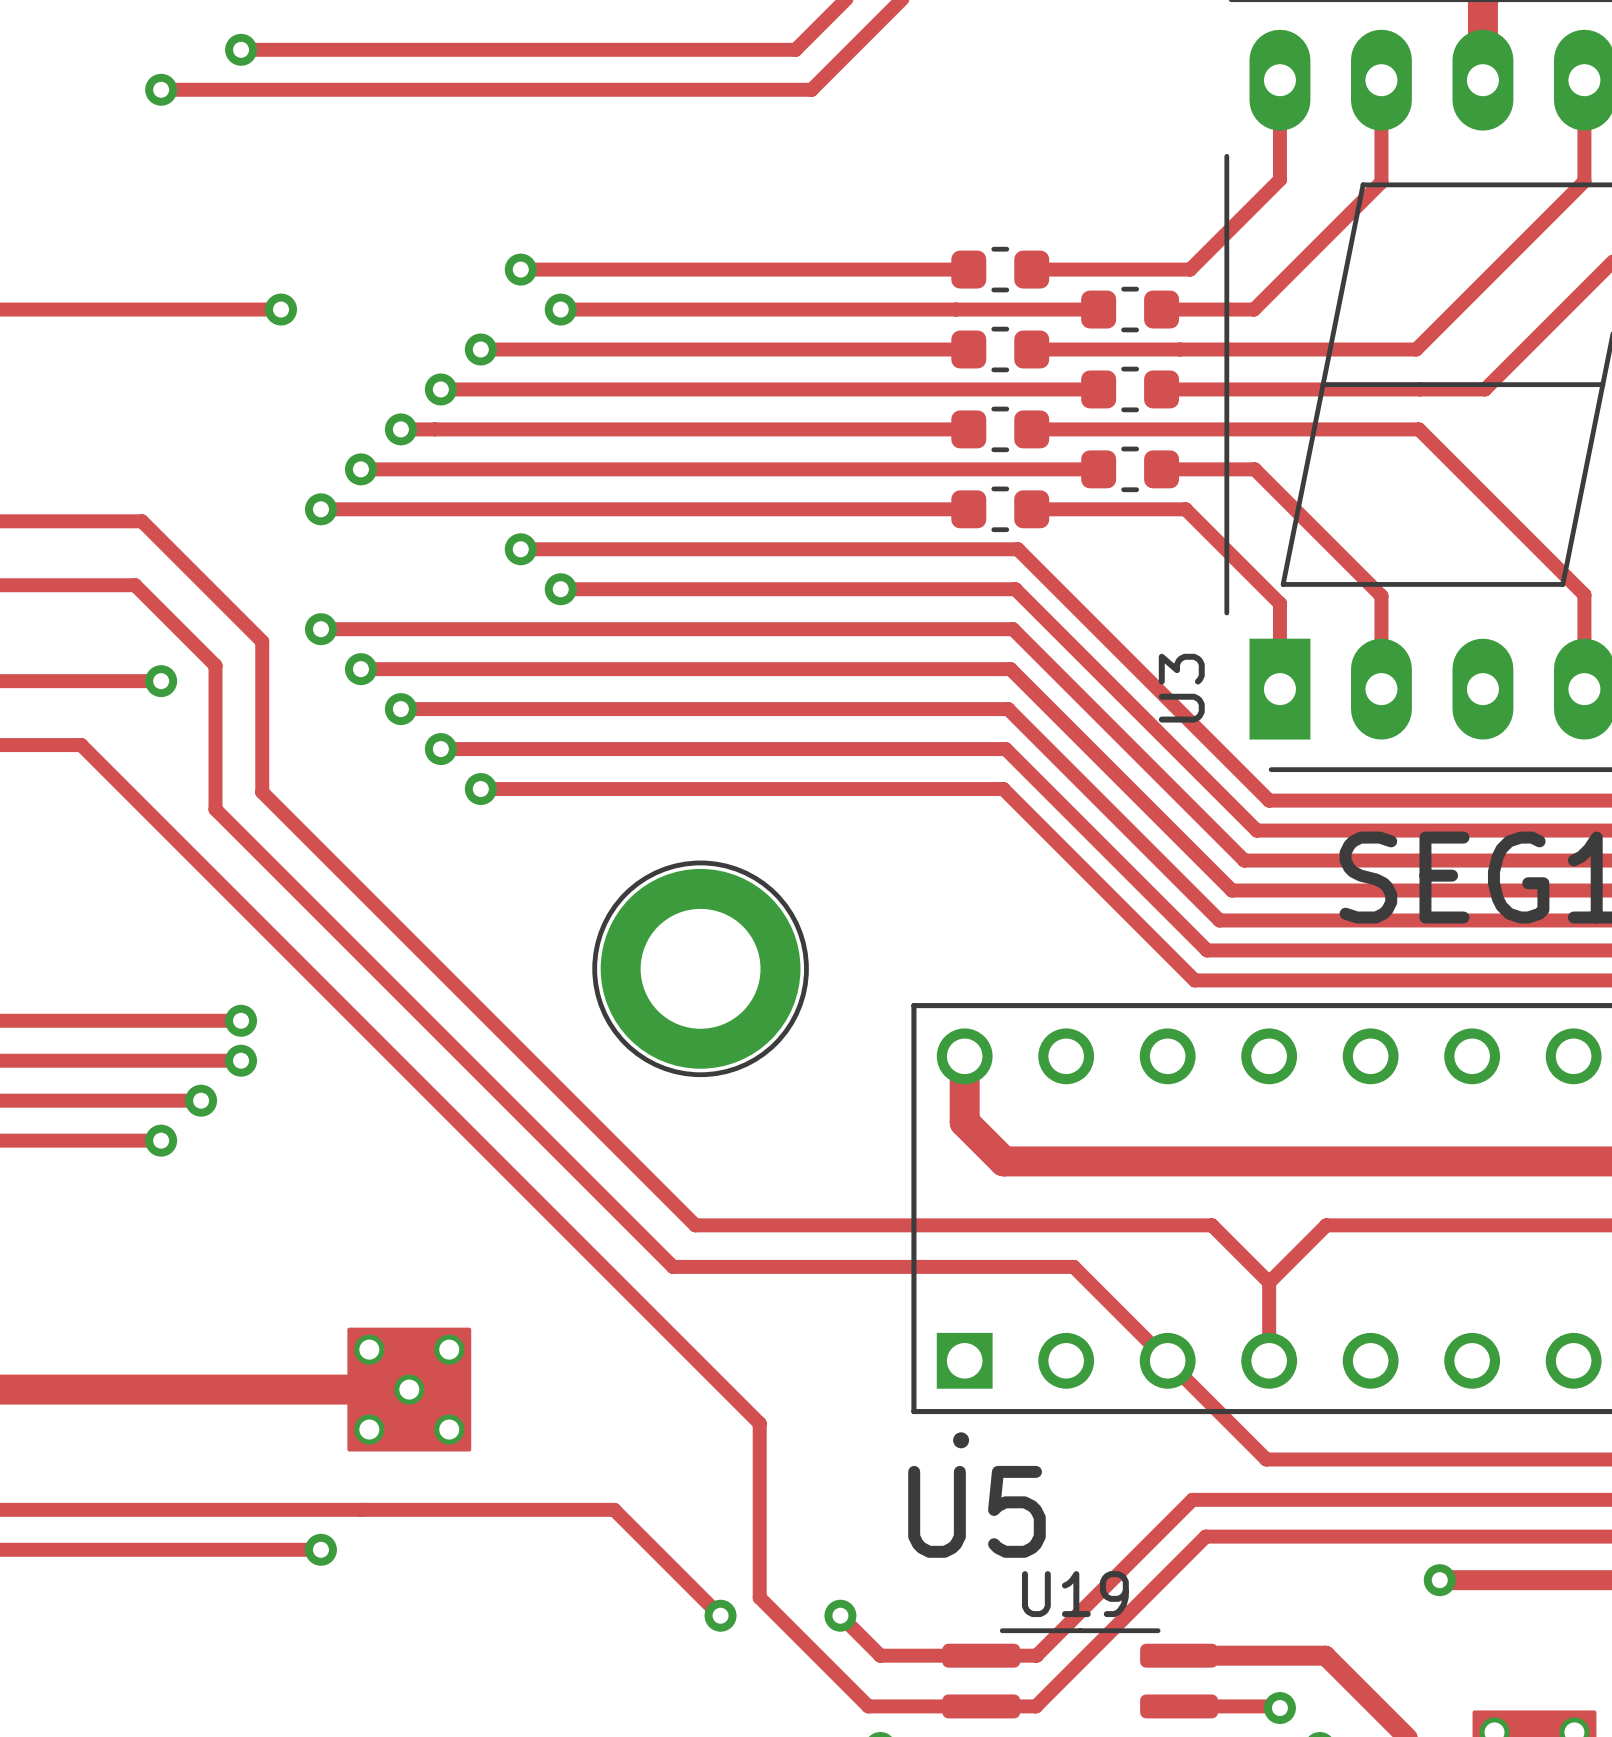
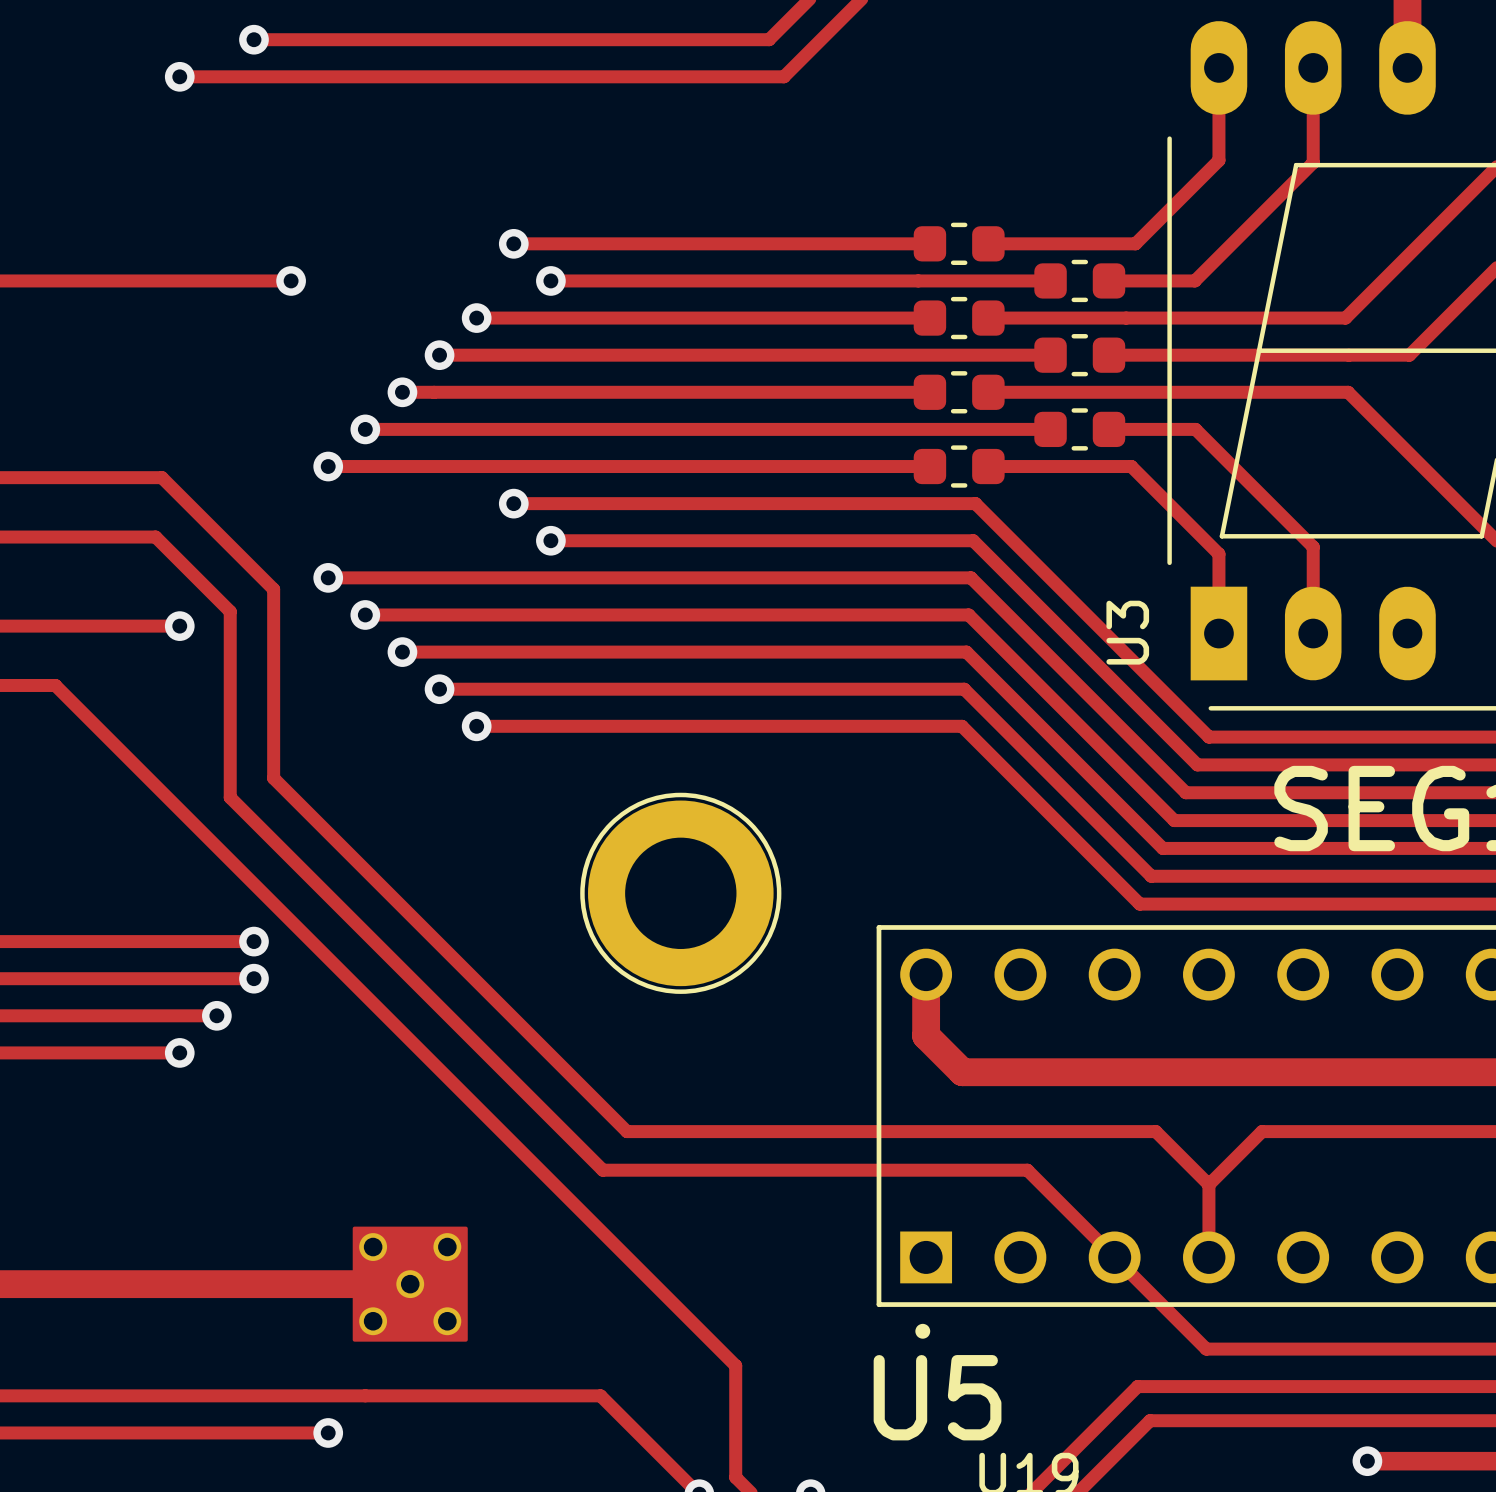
track: (27, 745) (81, 745) (759, 1423) (759, 1477) -> (55, 685) (735, 1365)
track: (262, 792) (695, 1225) -> (273, 729) (273, 778) (626, 1131) (675, 1131)
track: (215, 809) (673, 1266) -> (230, 745) (230, 797) (602, 1170) (655, 1170)

